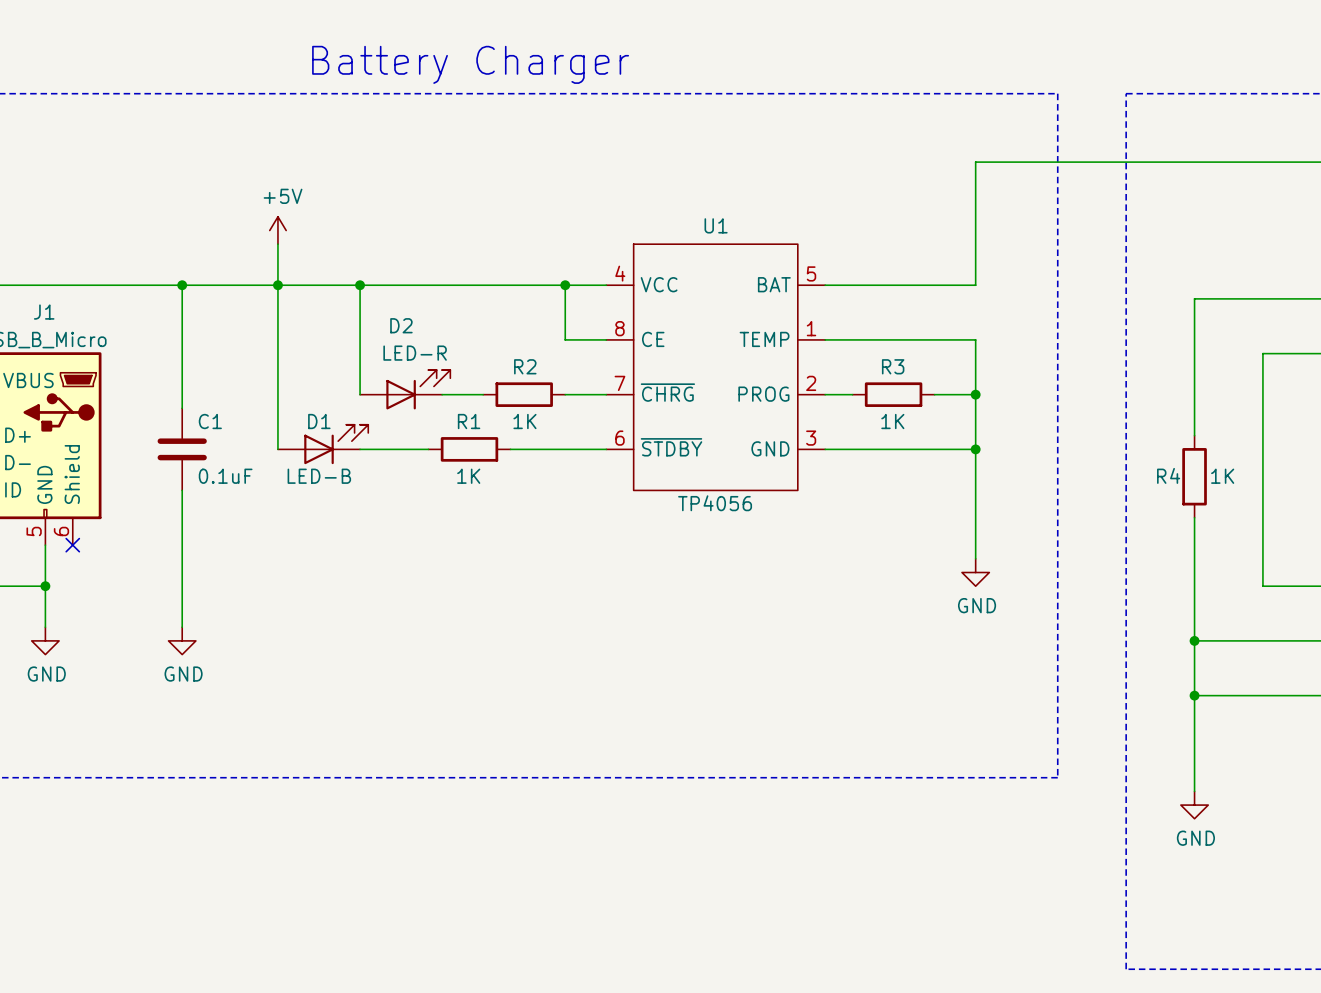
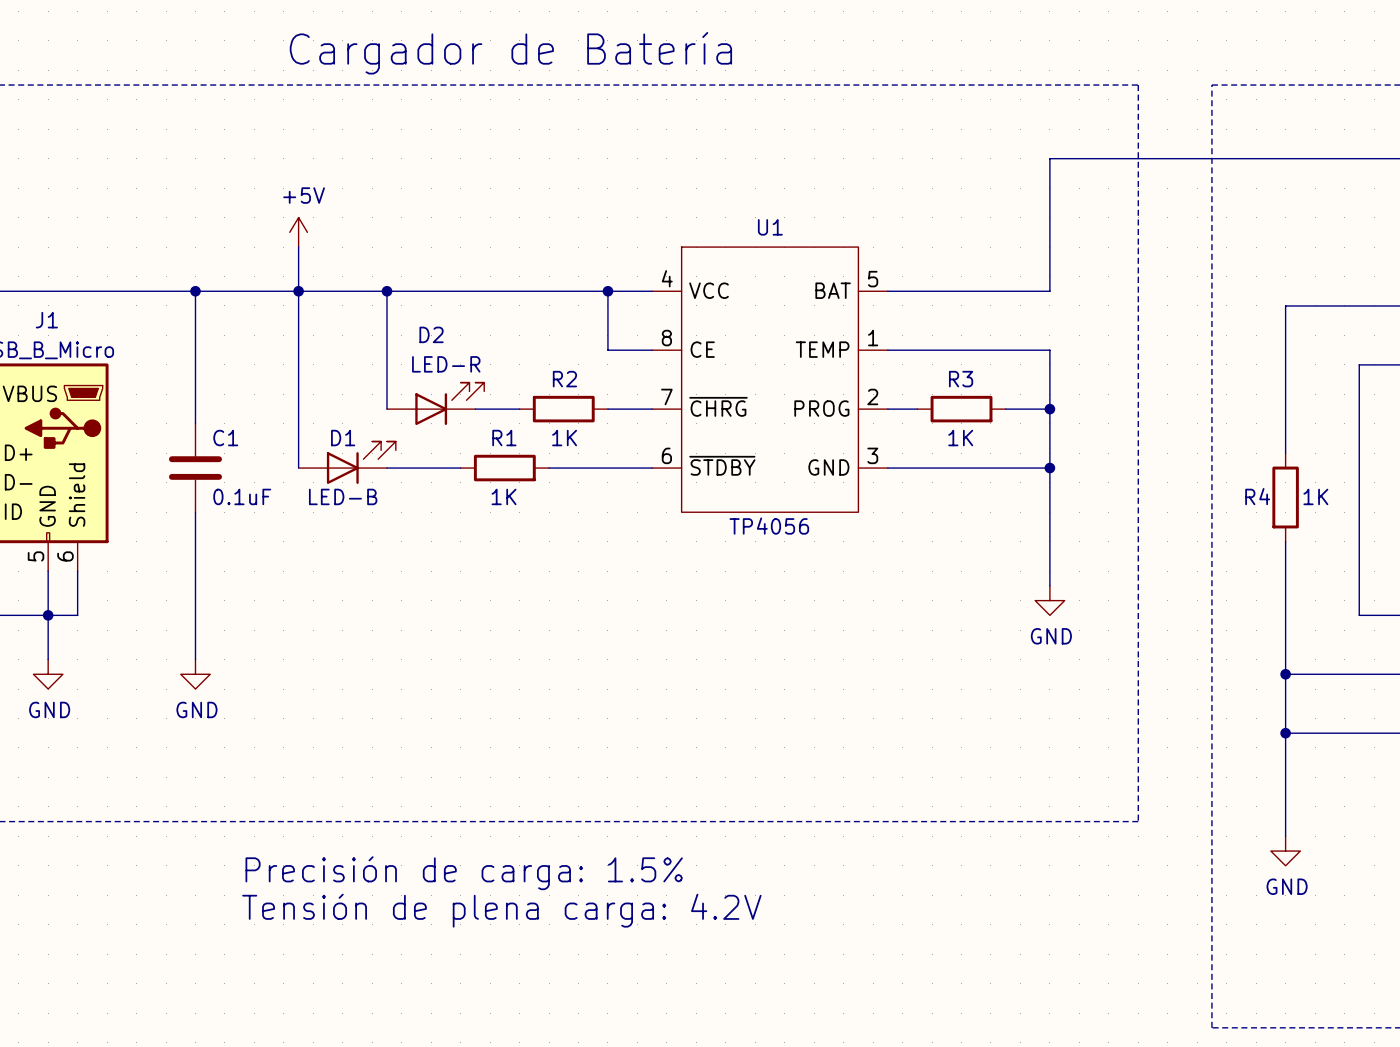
text: Battery Charger (470, 64) -> none
text: none -> Cargador de Batería (510, 53)
wire: none -> (77, 571) (77, 615) (48, 615)
no-connect mark: (72, 545) -> none
text: none -> Precisión de carga: 1.5% (464, 873)
text: none -> Tensión de plena carga: 4.2V (501, 910)

